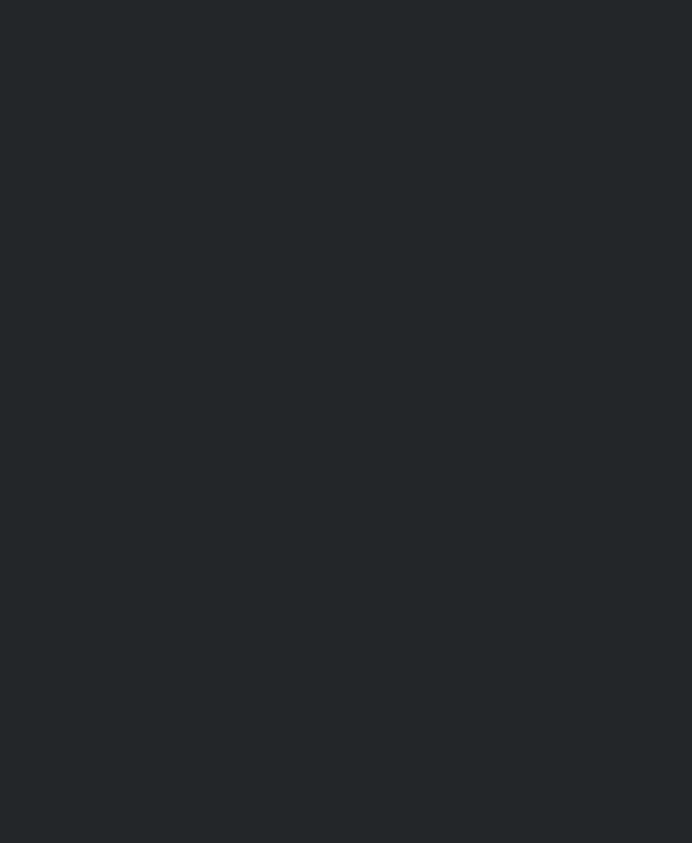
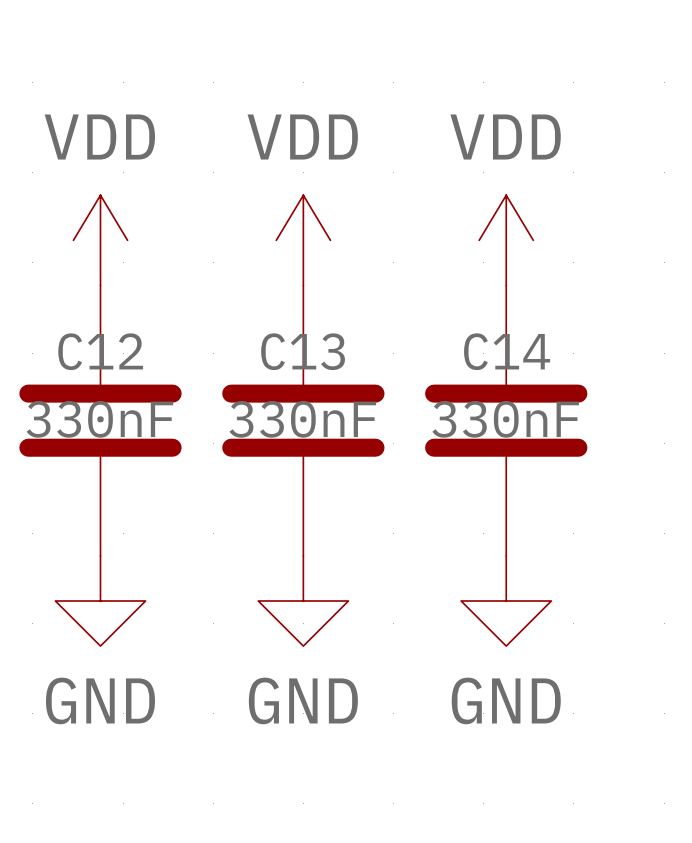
power symbol: none -> VDD (100, 240)
power symbol: none -> VDD (303, 240)
power symbol: none -> VDD (506, 240)
C12: none -> 330nF (100, 420)
C13: none -> 330nF (303, 420)
C14: none -> 330nF (506, 420)
power symbol: none -> GND (100, 601)
power symbol: none -> GND (303, 601)
power symbol: none -> GND (506, 601)

